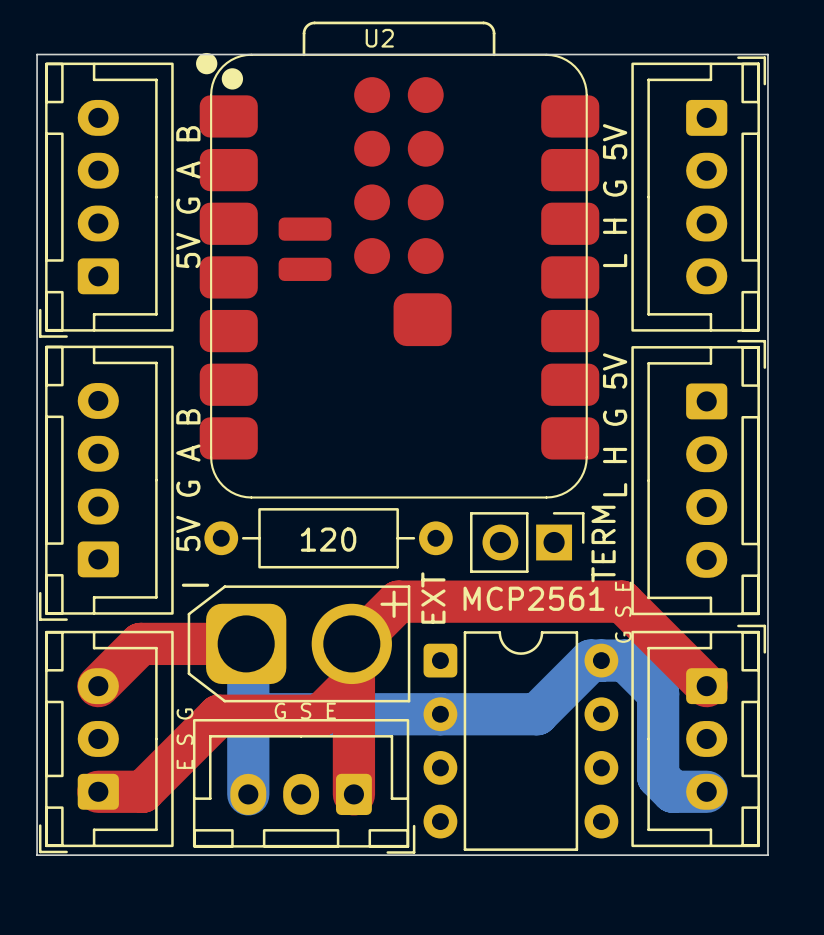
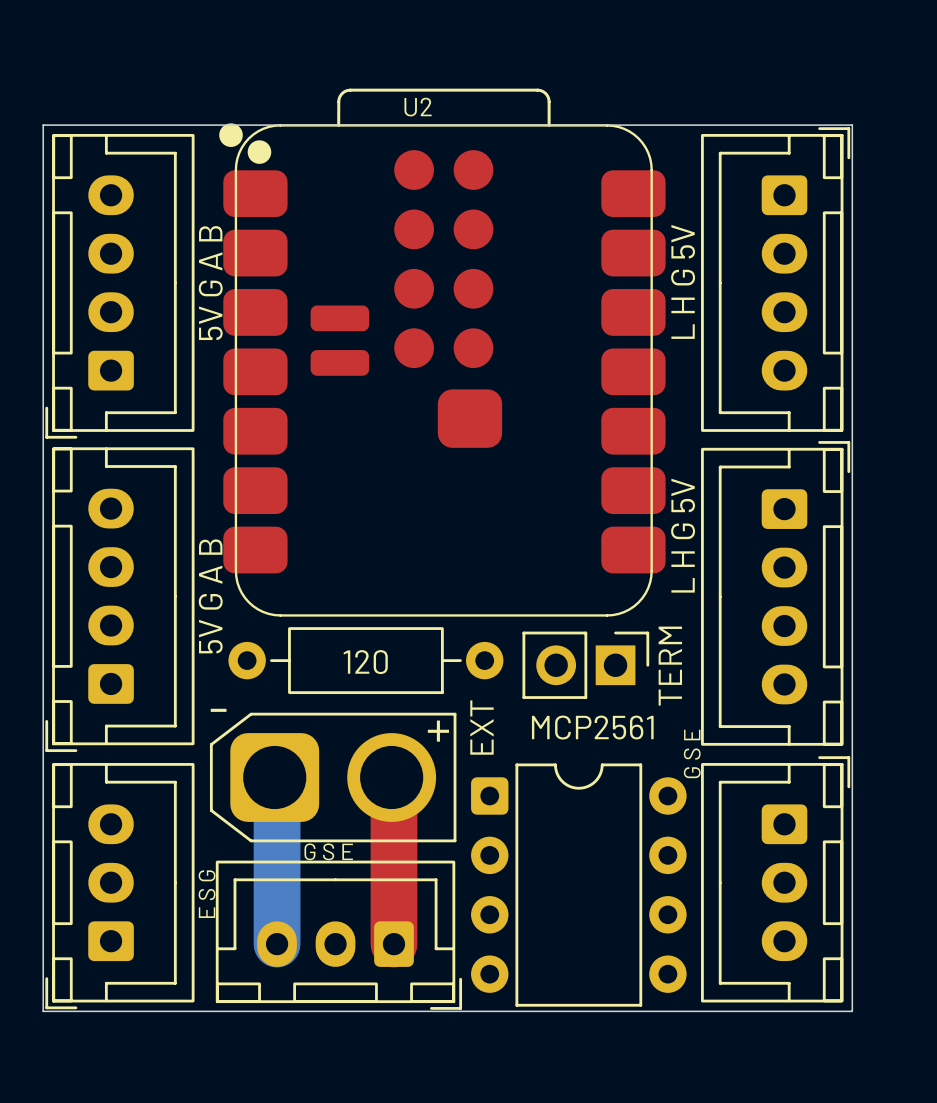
top track: (246, 643) (140, 643) (98, 686) -> none
top track: (706, 686) (622, 601) (398, 601) (353, 646) (351, 643) (351, 684) (320, 715) (218, 715) (142, 791) (98, 791) -> none
bottom track: (248, 713) (537, 714) (590, 660) (625, 660) (658, 693) (658, 776) (672, 791) (706, 791) -> none

